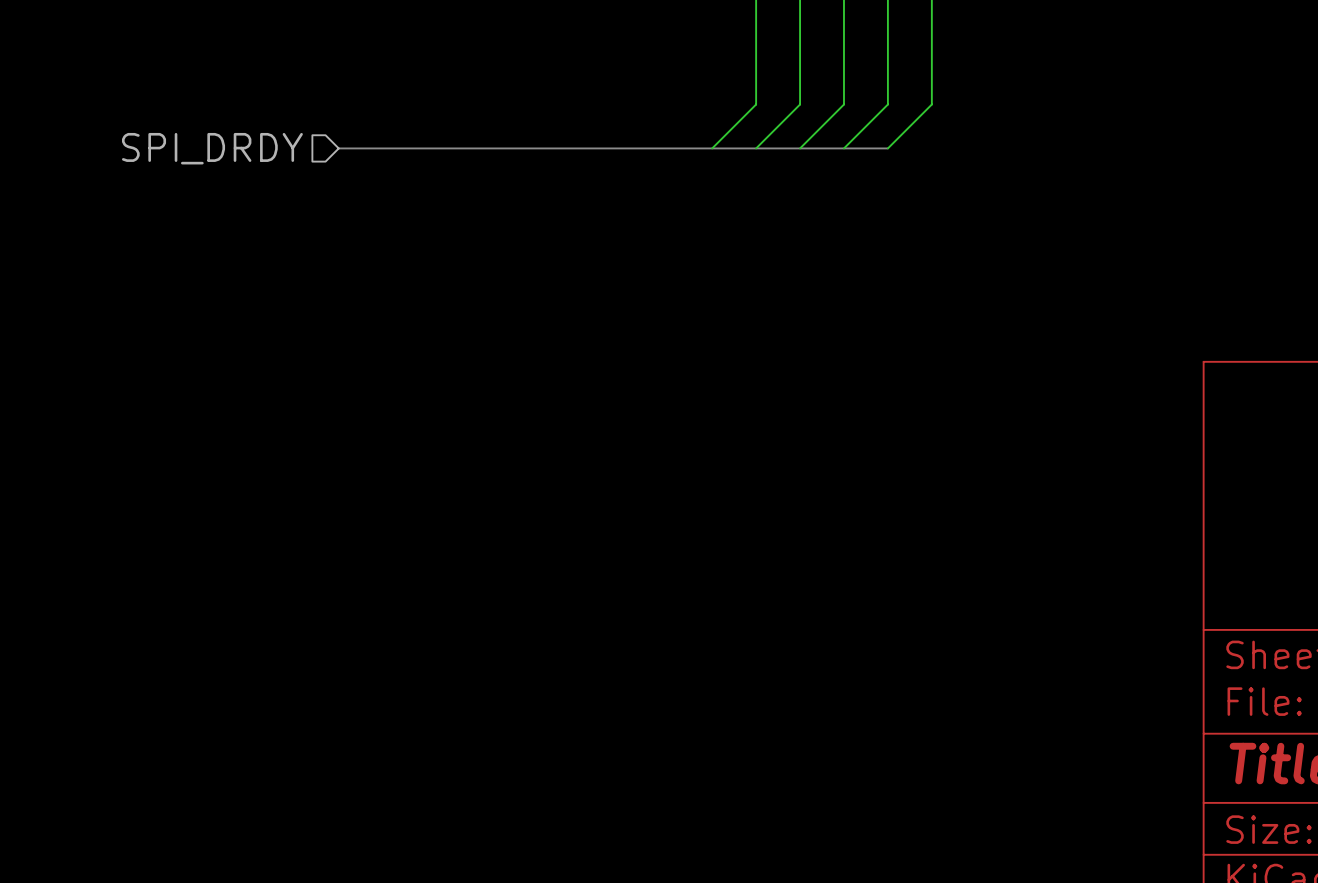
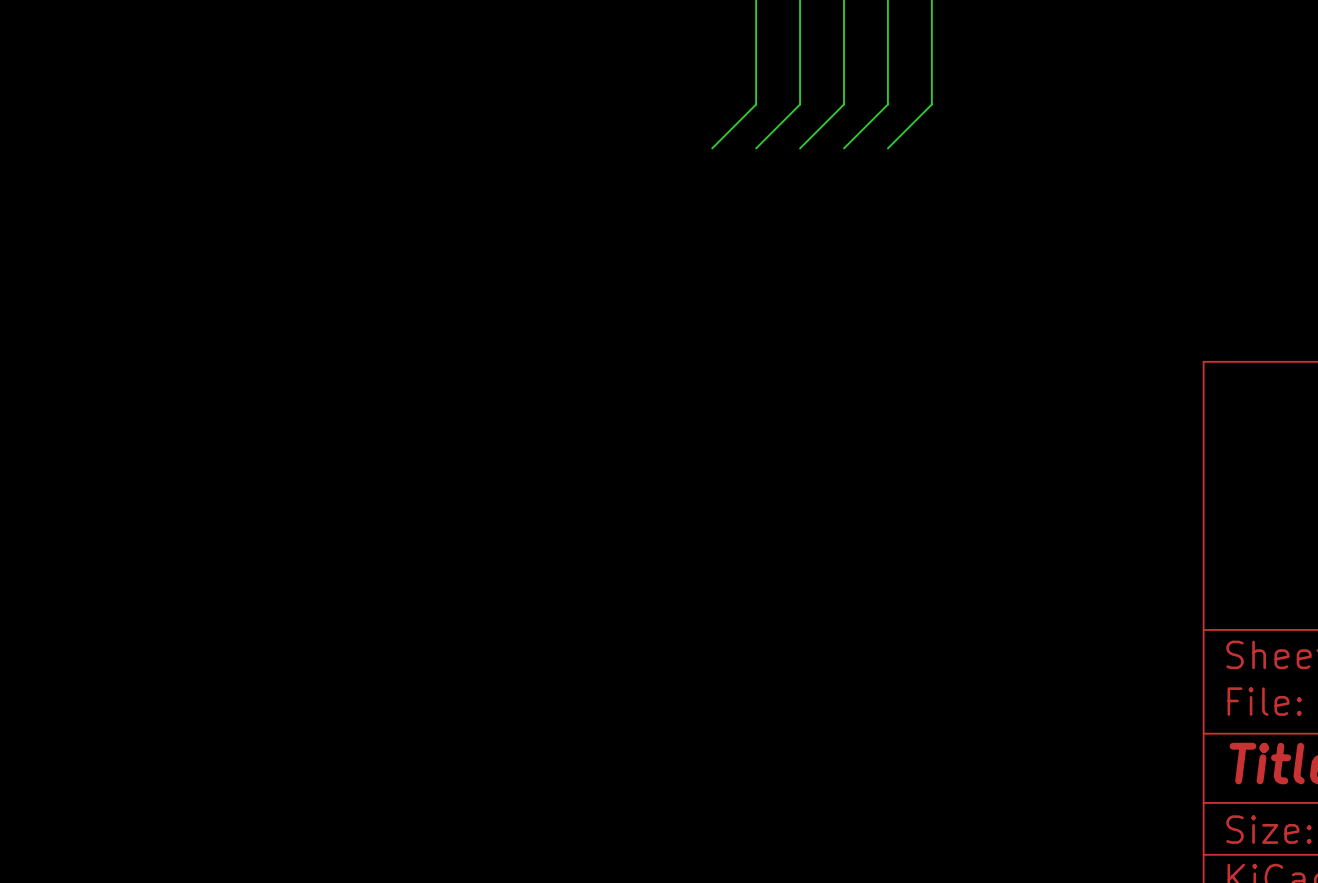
hierarchical label: SPI_DRDY (212, 148) -> none
bus: (338, 148) (887, 148) -> none

